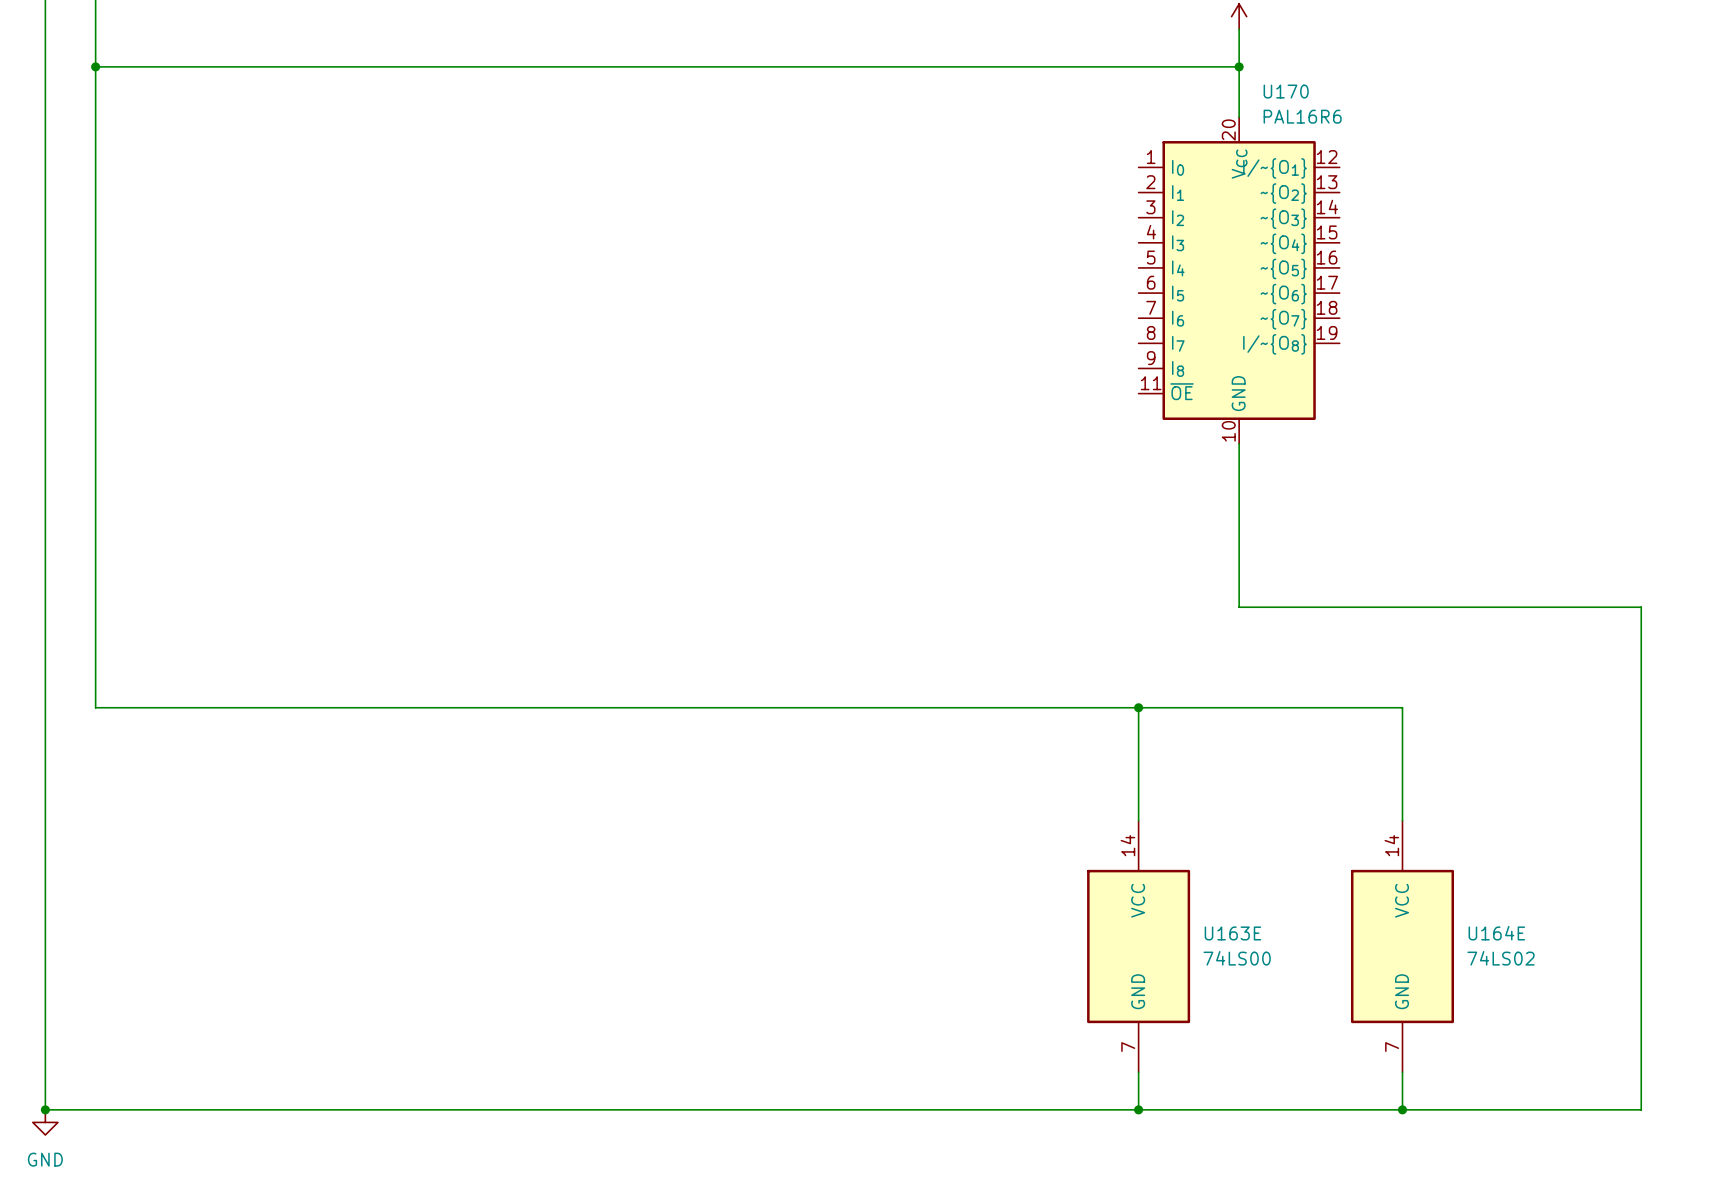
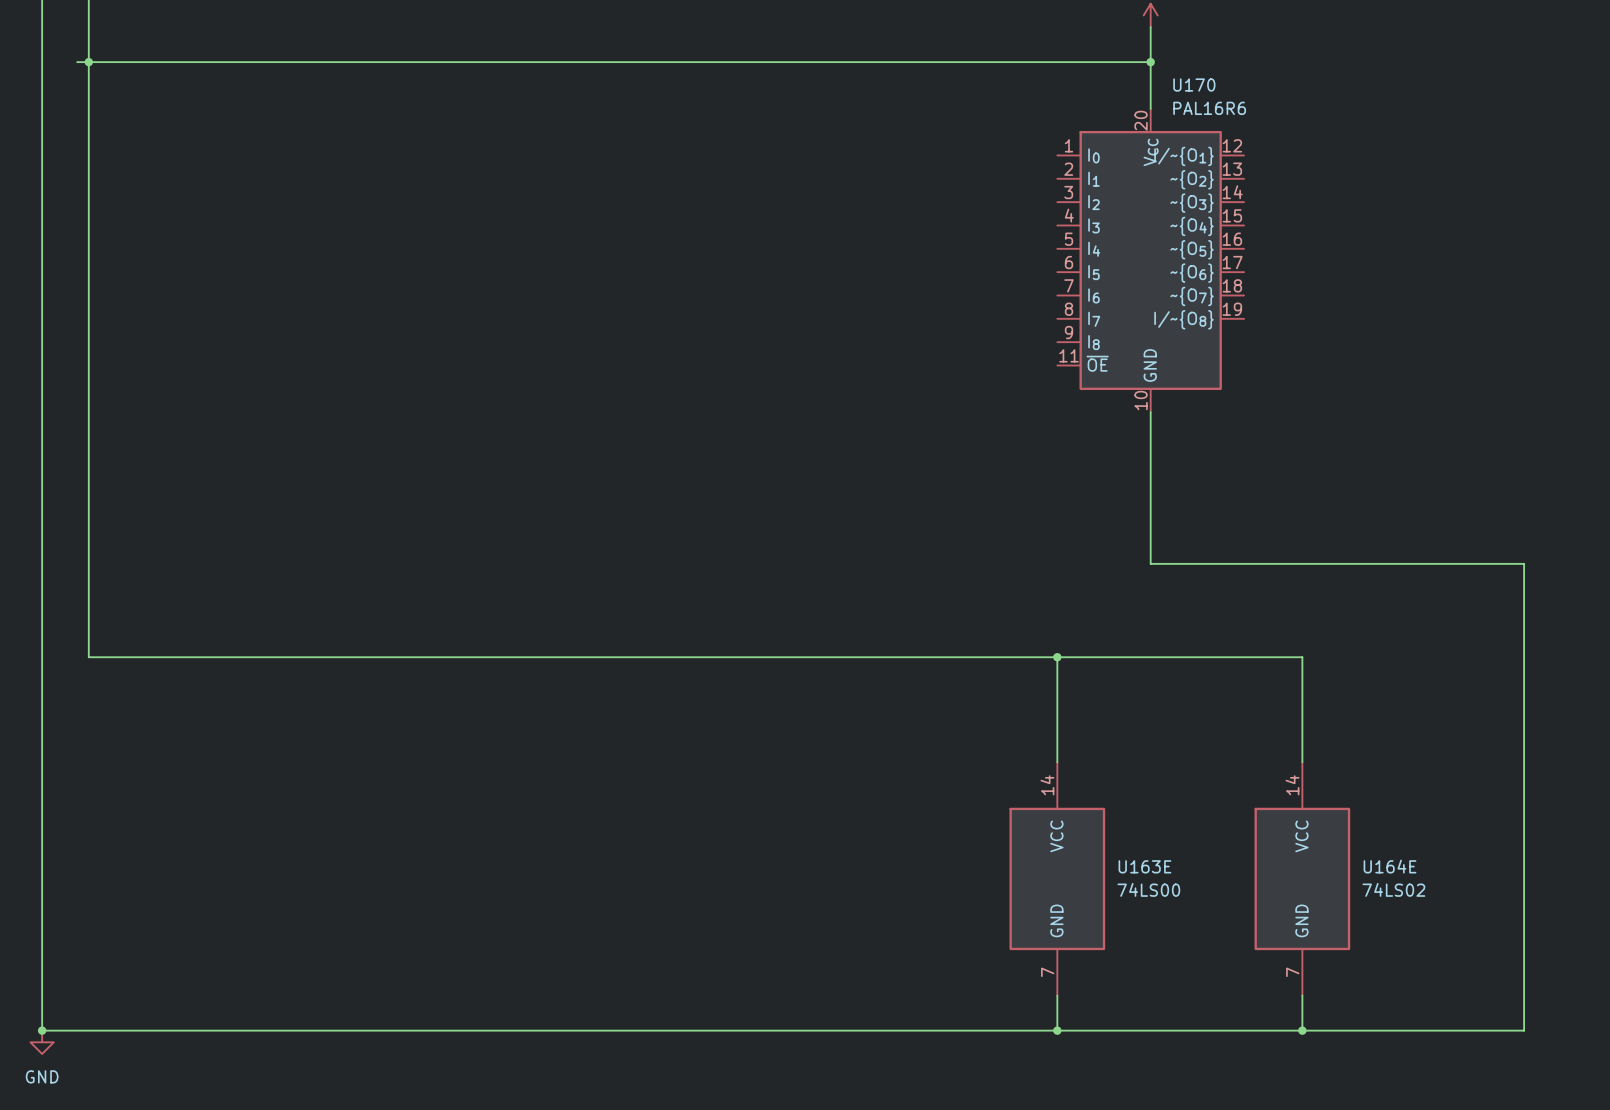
wire: none -> (77, 62) (88, 62)

